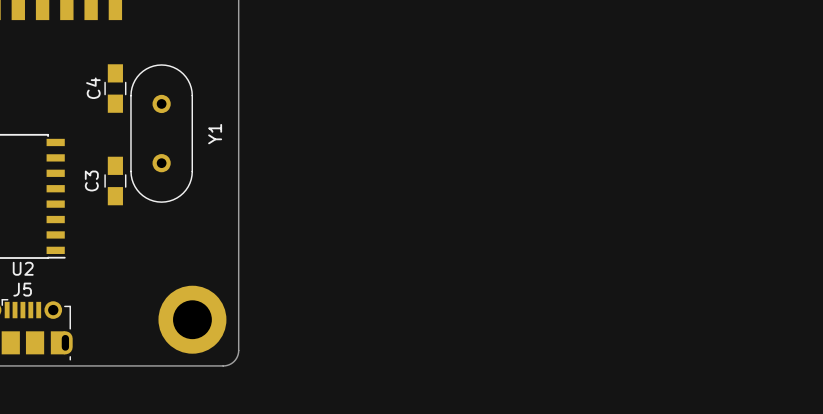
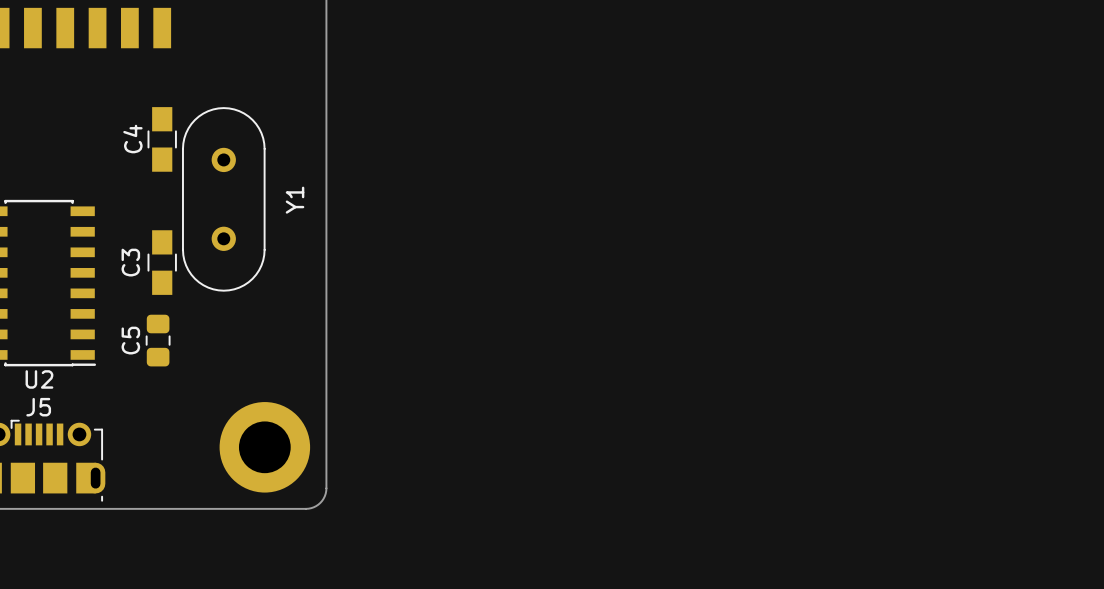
C5: none -> (158, 340)

